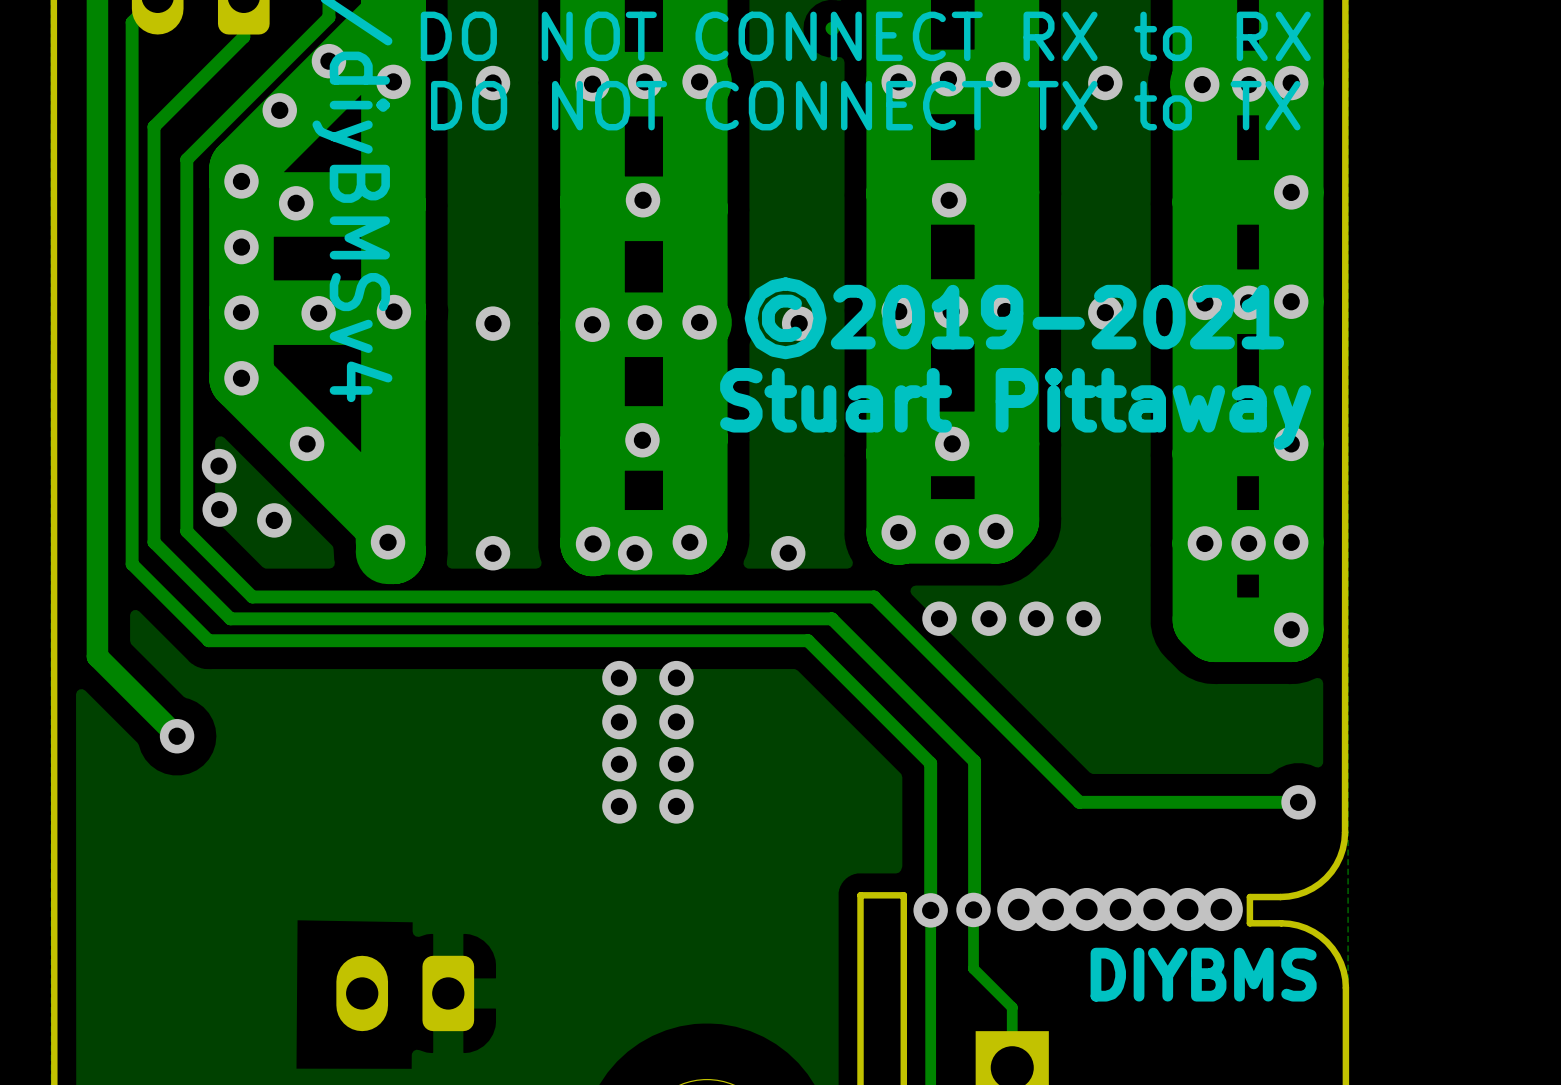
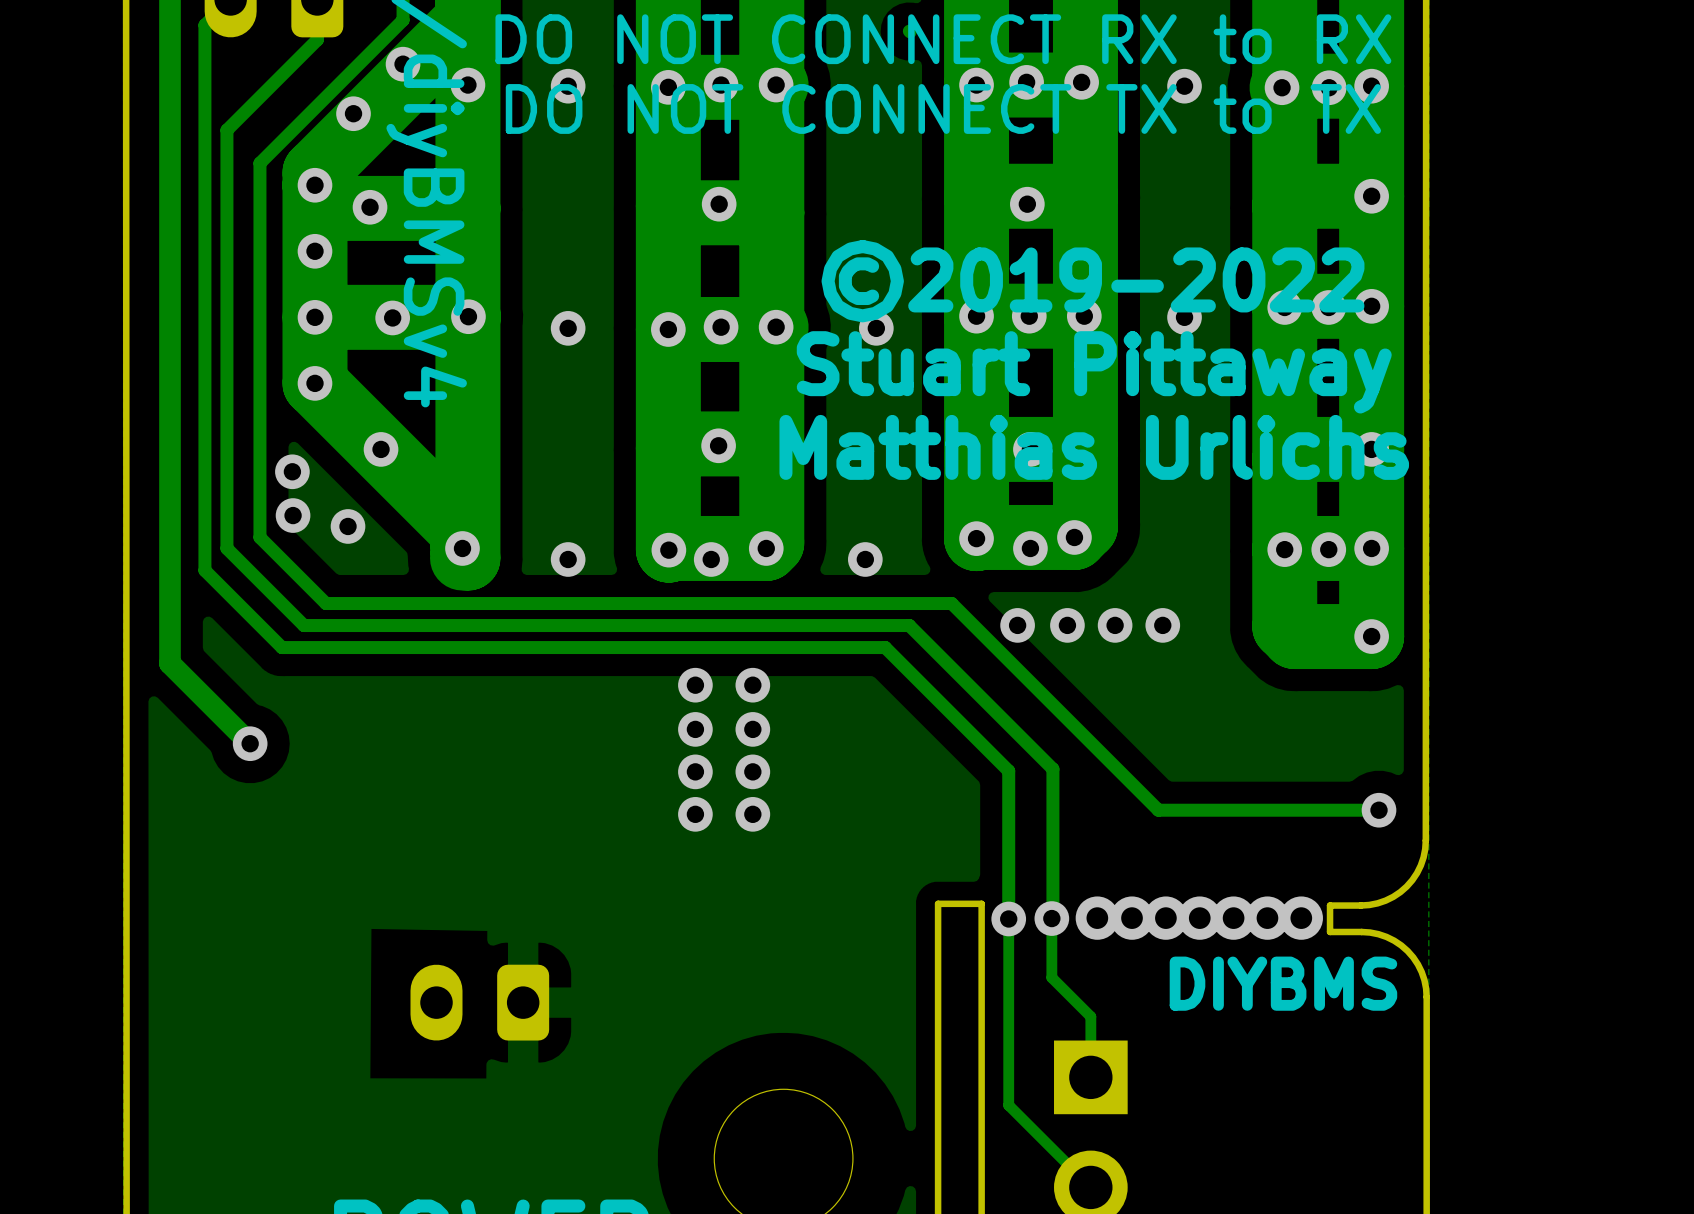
text: ©2019-2021 (1014, 318) -> ©2019-2022 (1093, 281)
text position: Stuart Pittaway (1015, 408) -> Stuart Pittaway (1094, 372)
text: none -> Matthias Urlichs (1094, 447)

